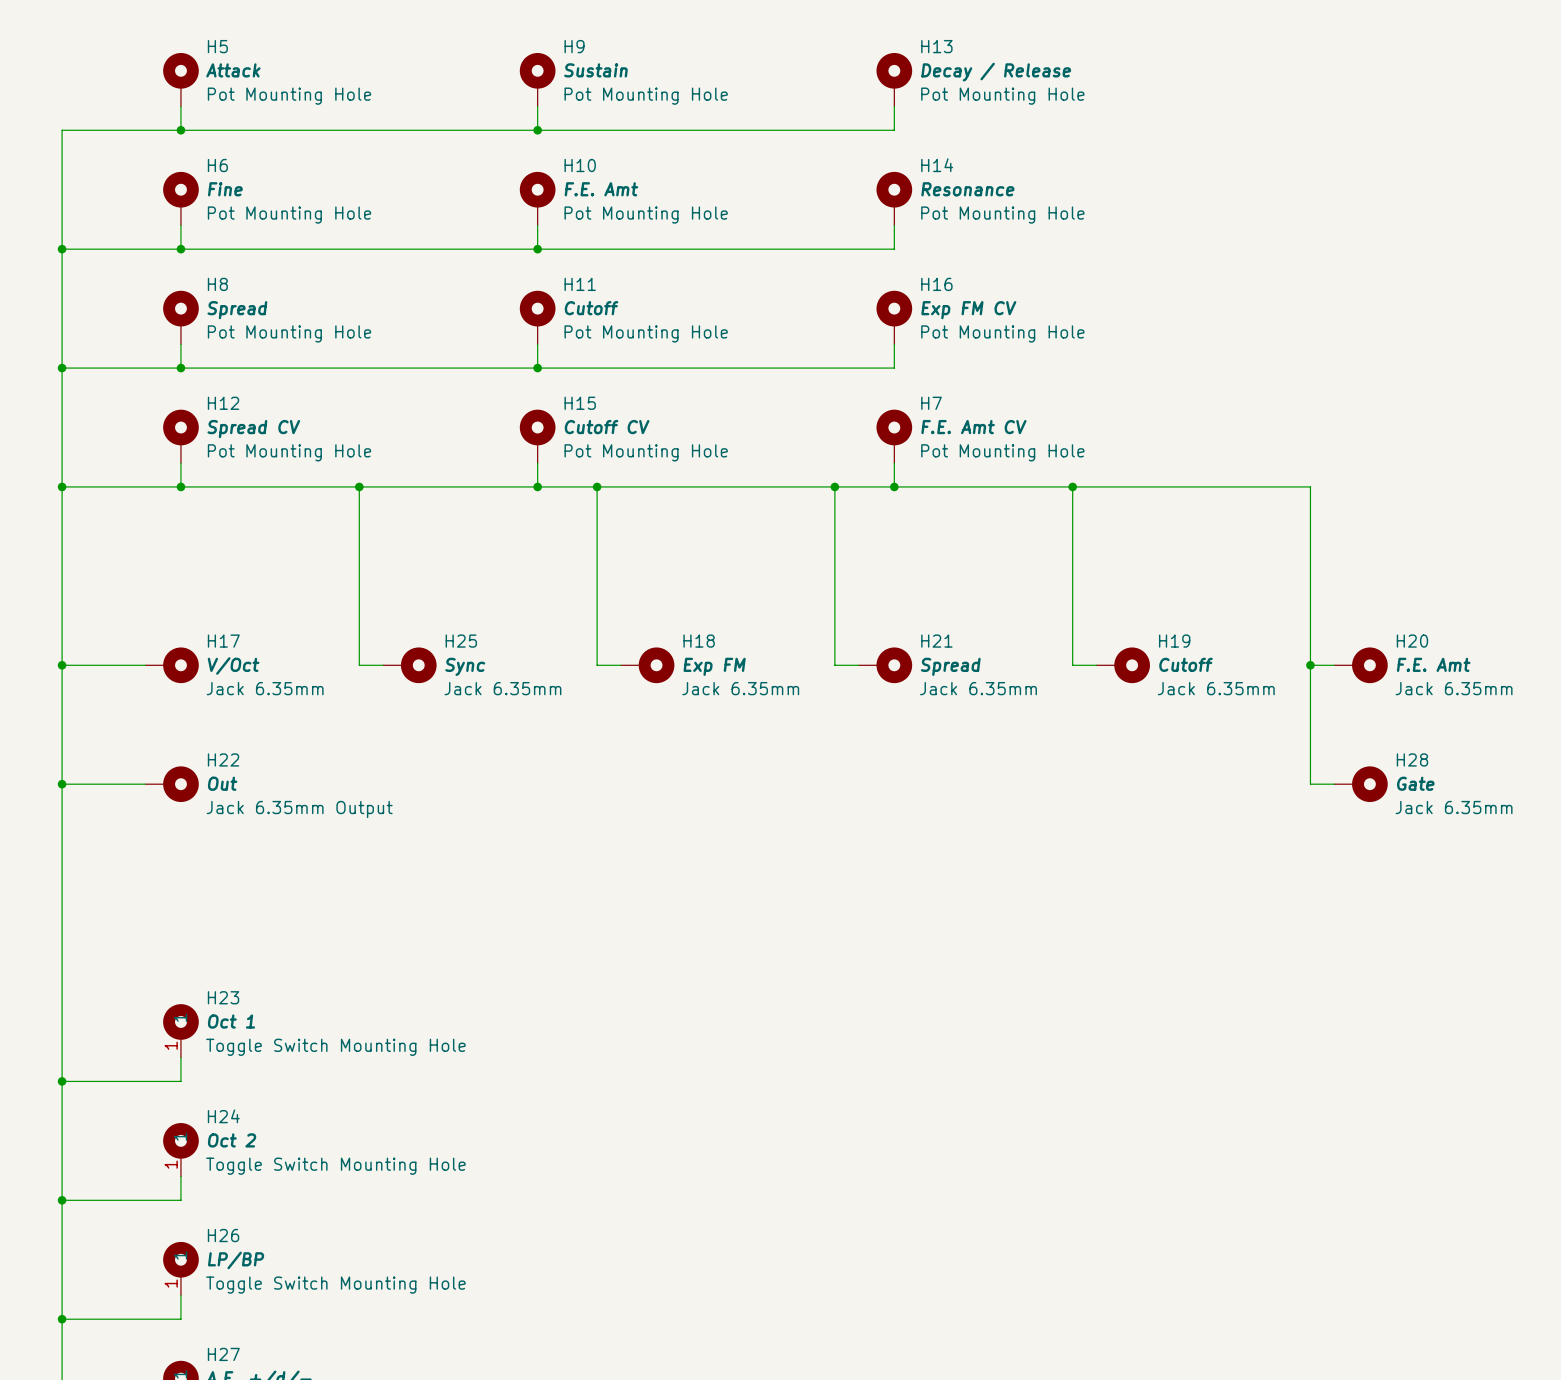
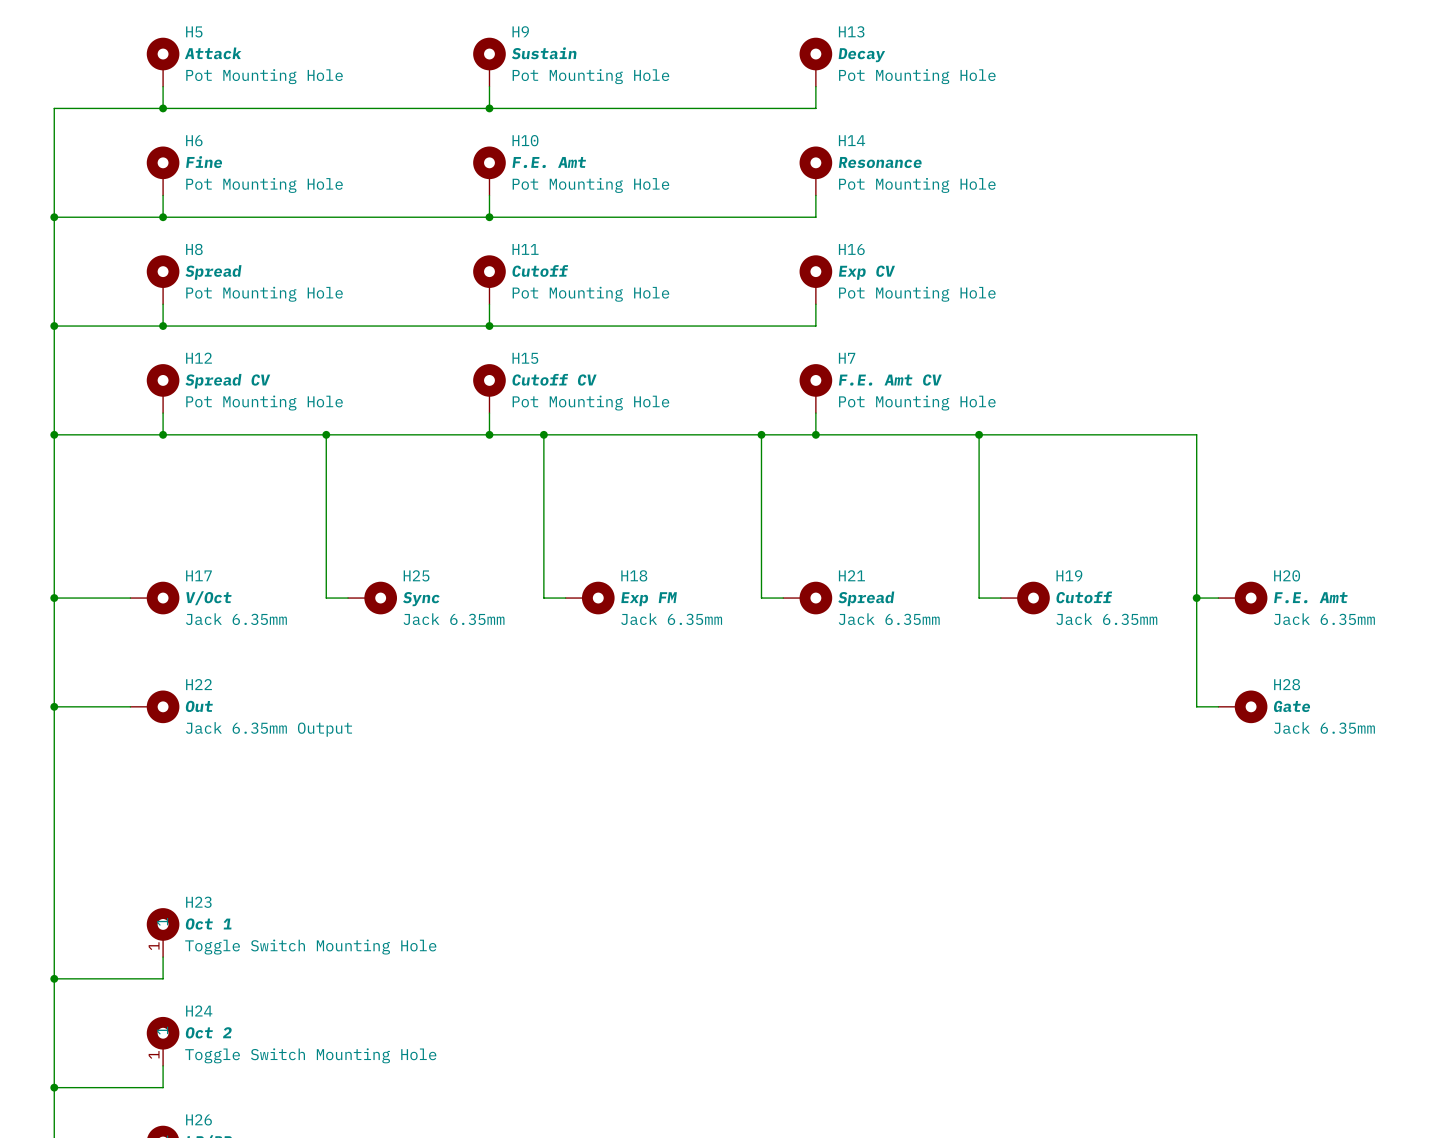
H13 value: Decay / Release (996, 72) -> Decay (861, 55)
H16 value: Exp FM CV (968, 310) -> Exp CV (866, 272)

